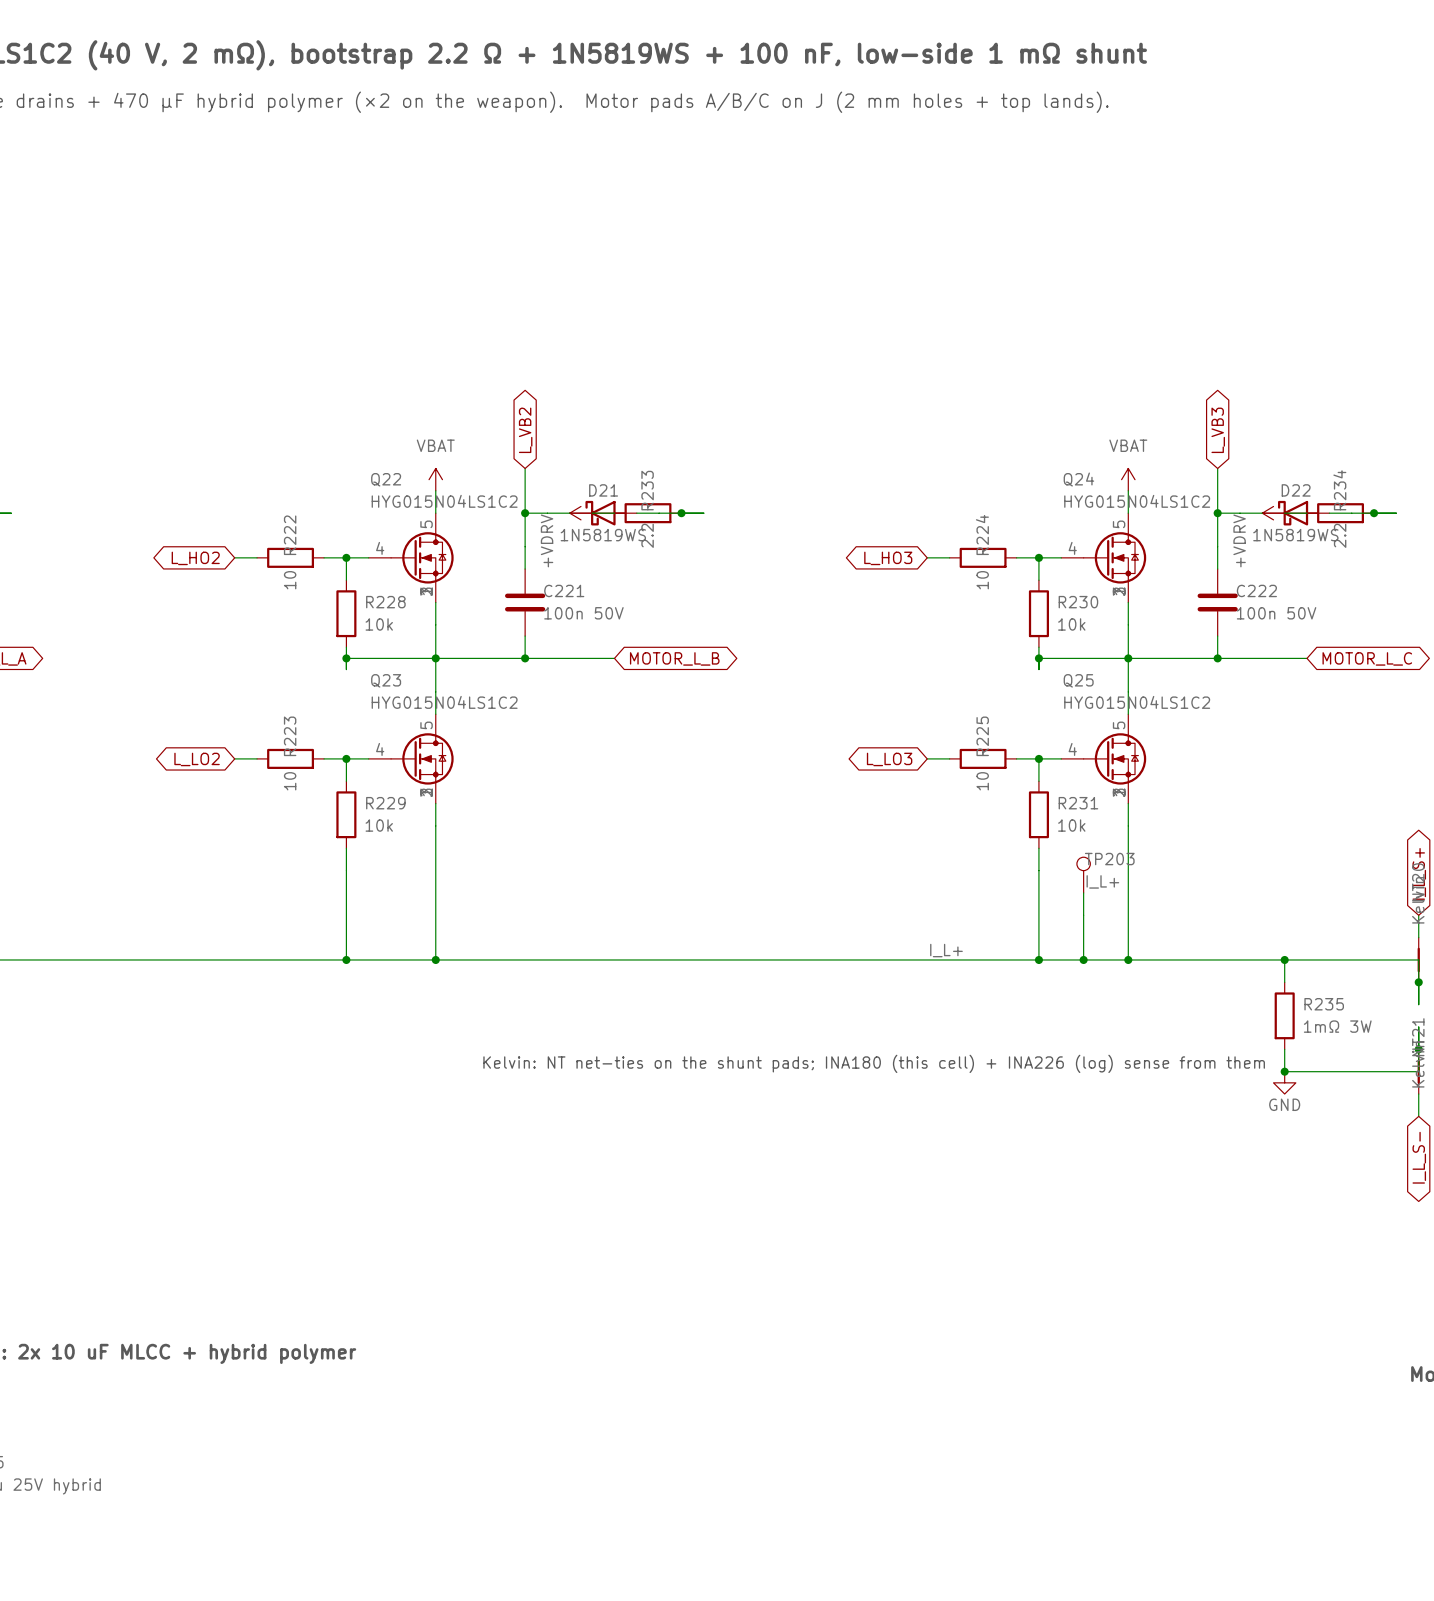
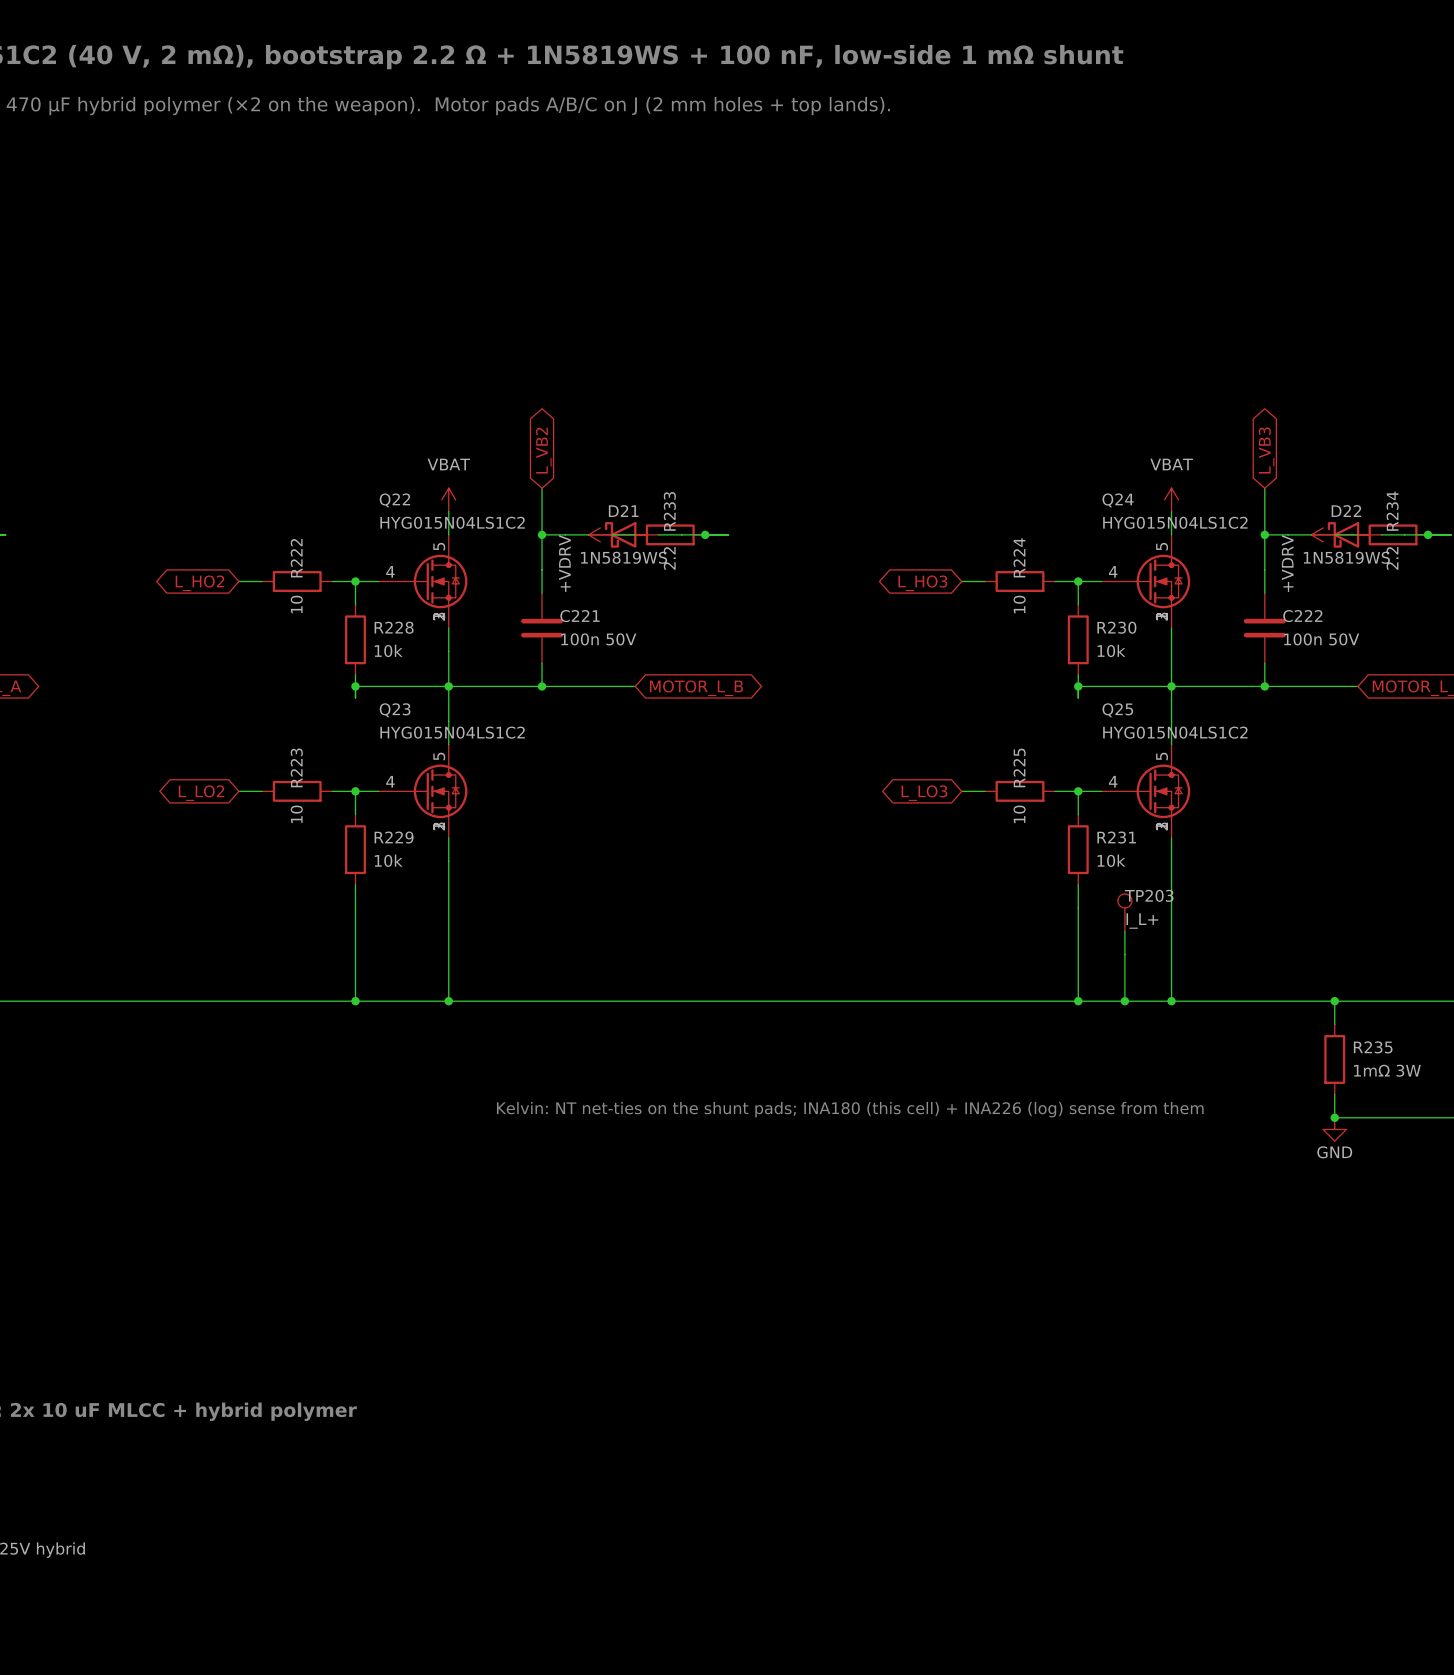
label: I_L+ (946, 950) -> none

